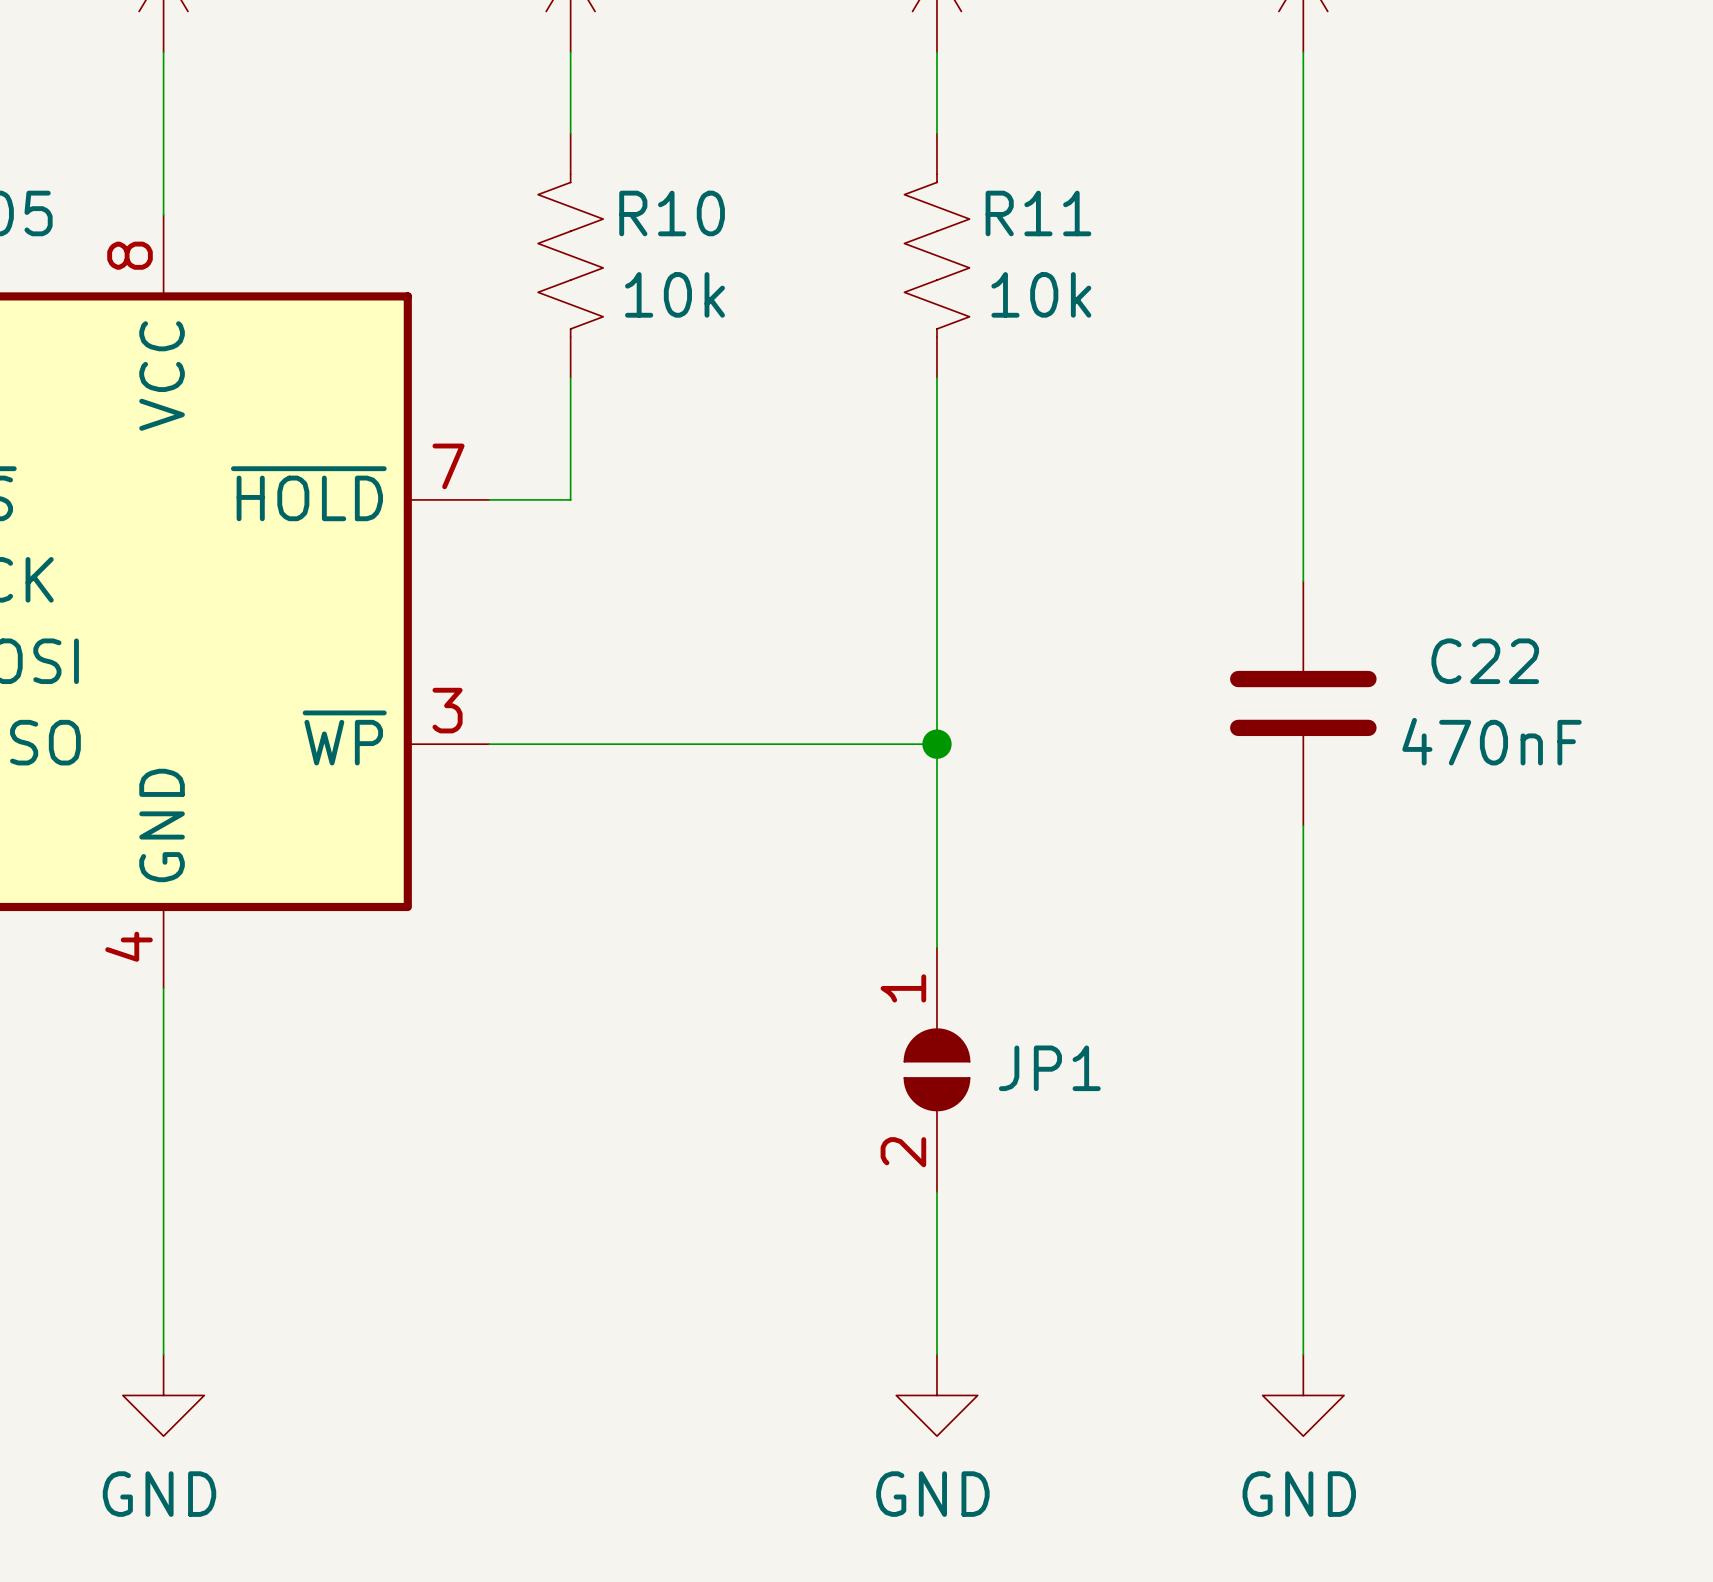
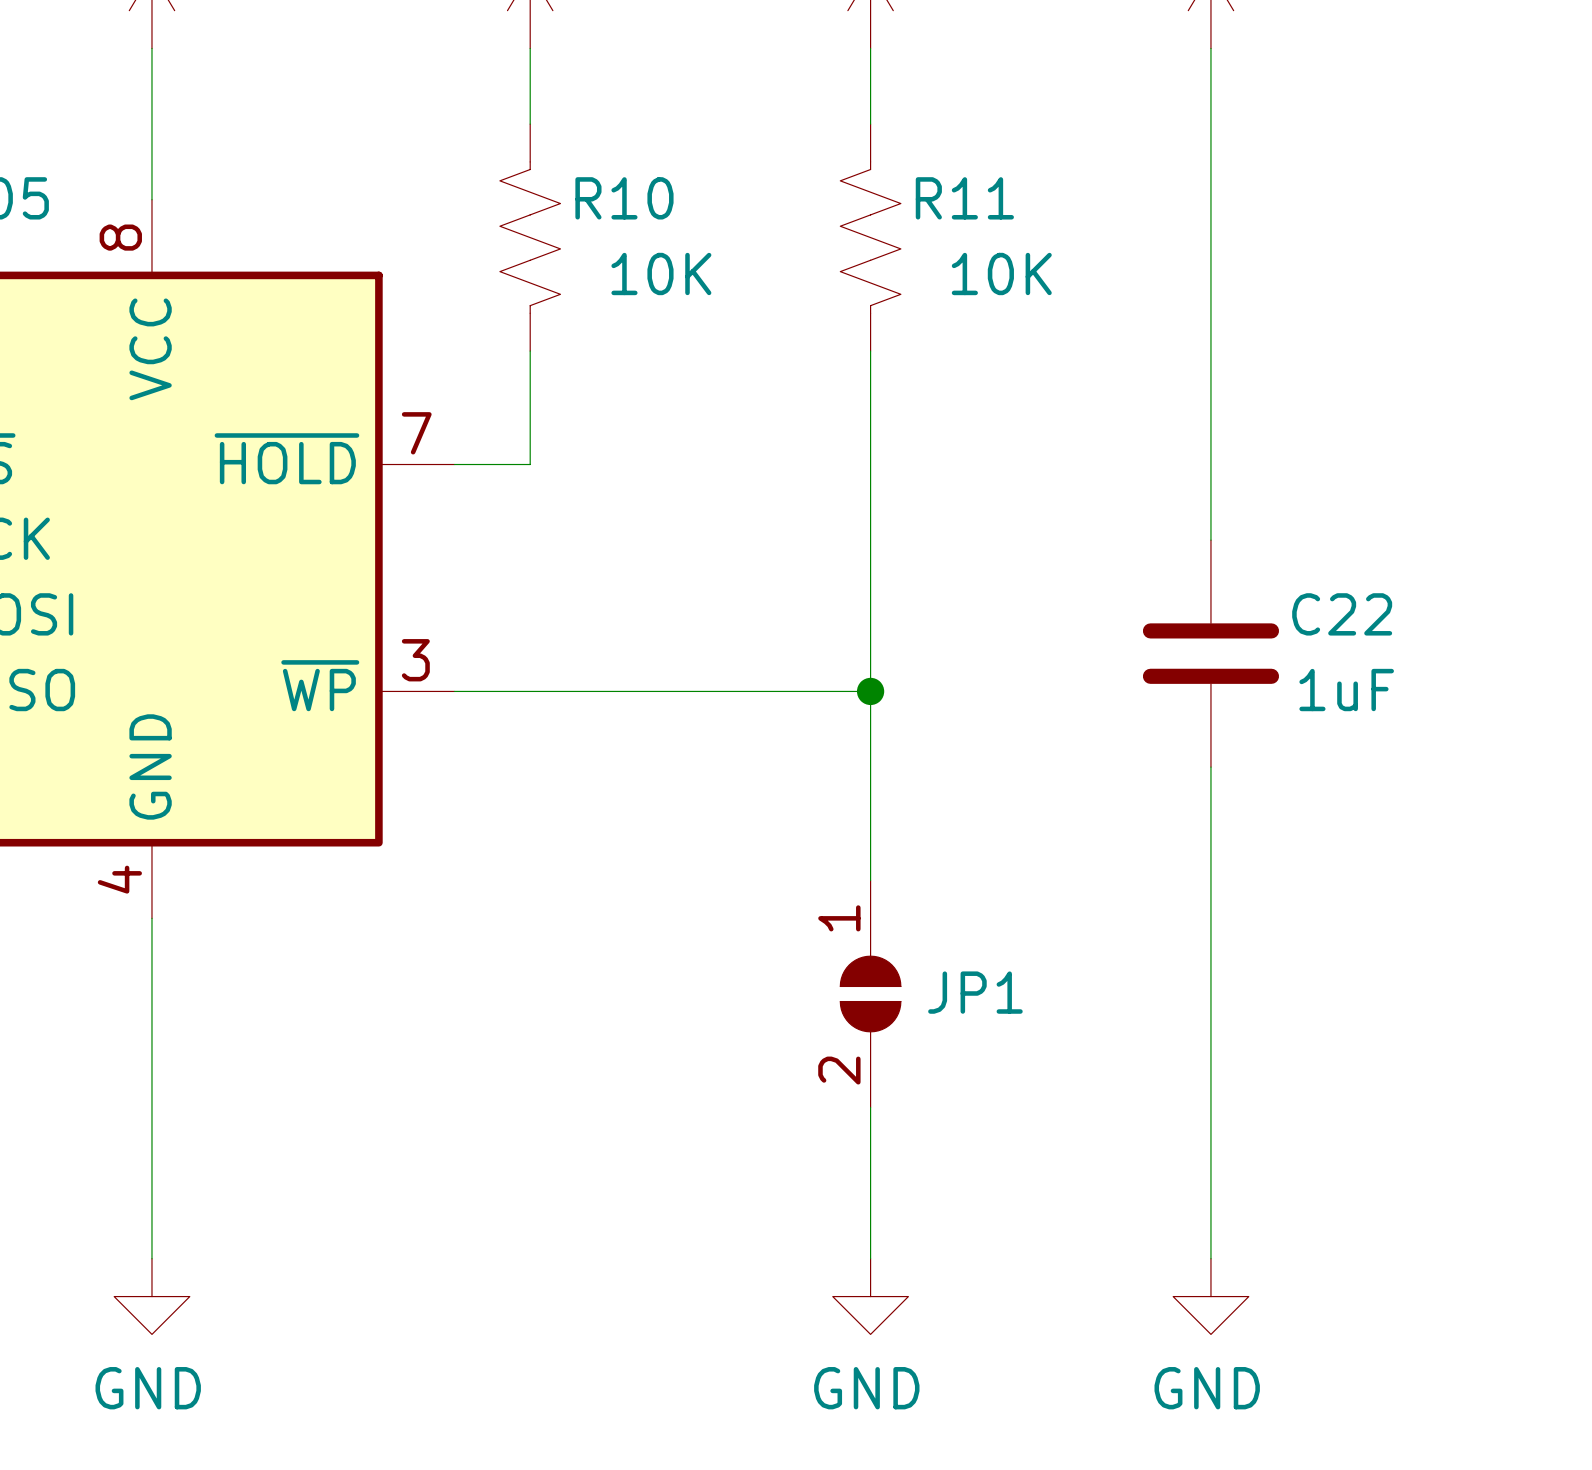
R10 value: 10k (675, 294) -> 10K (661, 273)
R11 value: 10k (1041, 294) -> 10K (1001, 273)
C22 name position: C22 (1485, 661) -> C22 (1342, 614)
C22 value: 470nF (1492, 741) -> 1uF (1346, 690)

